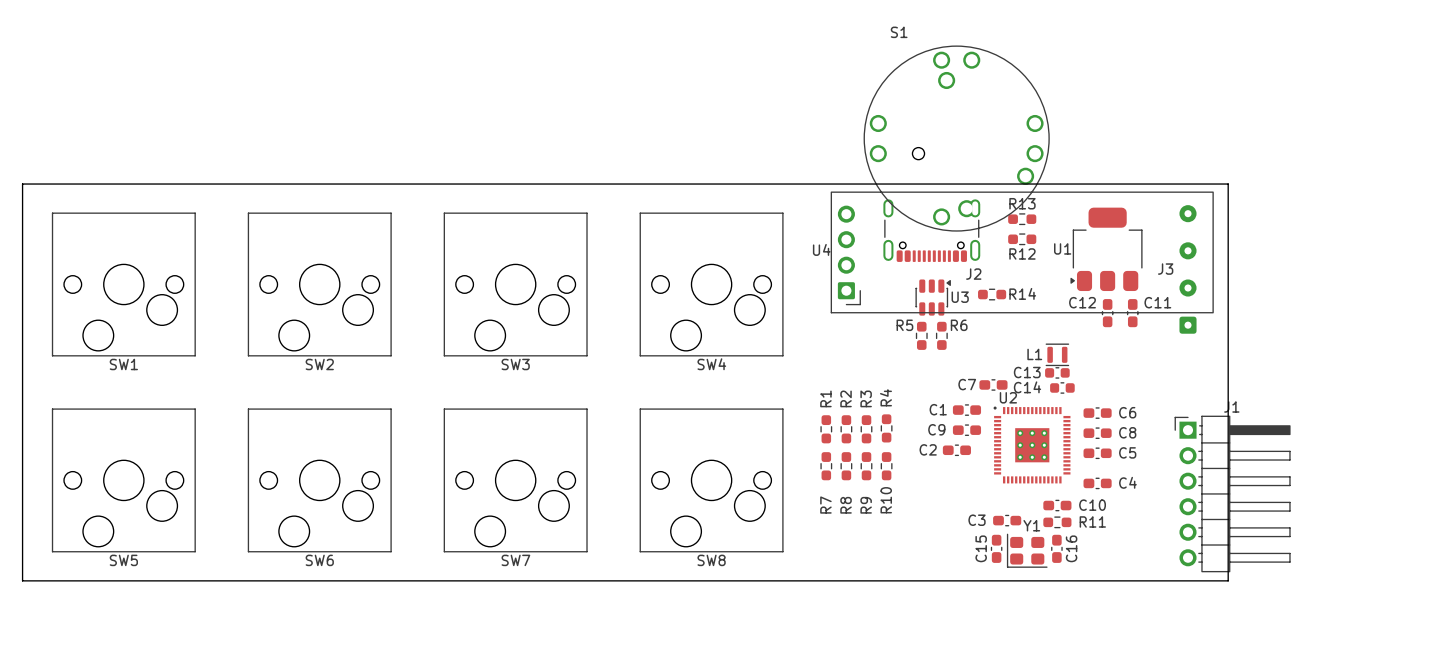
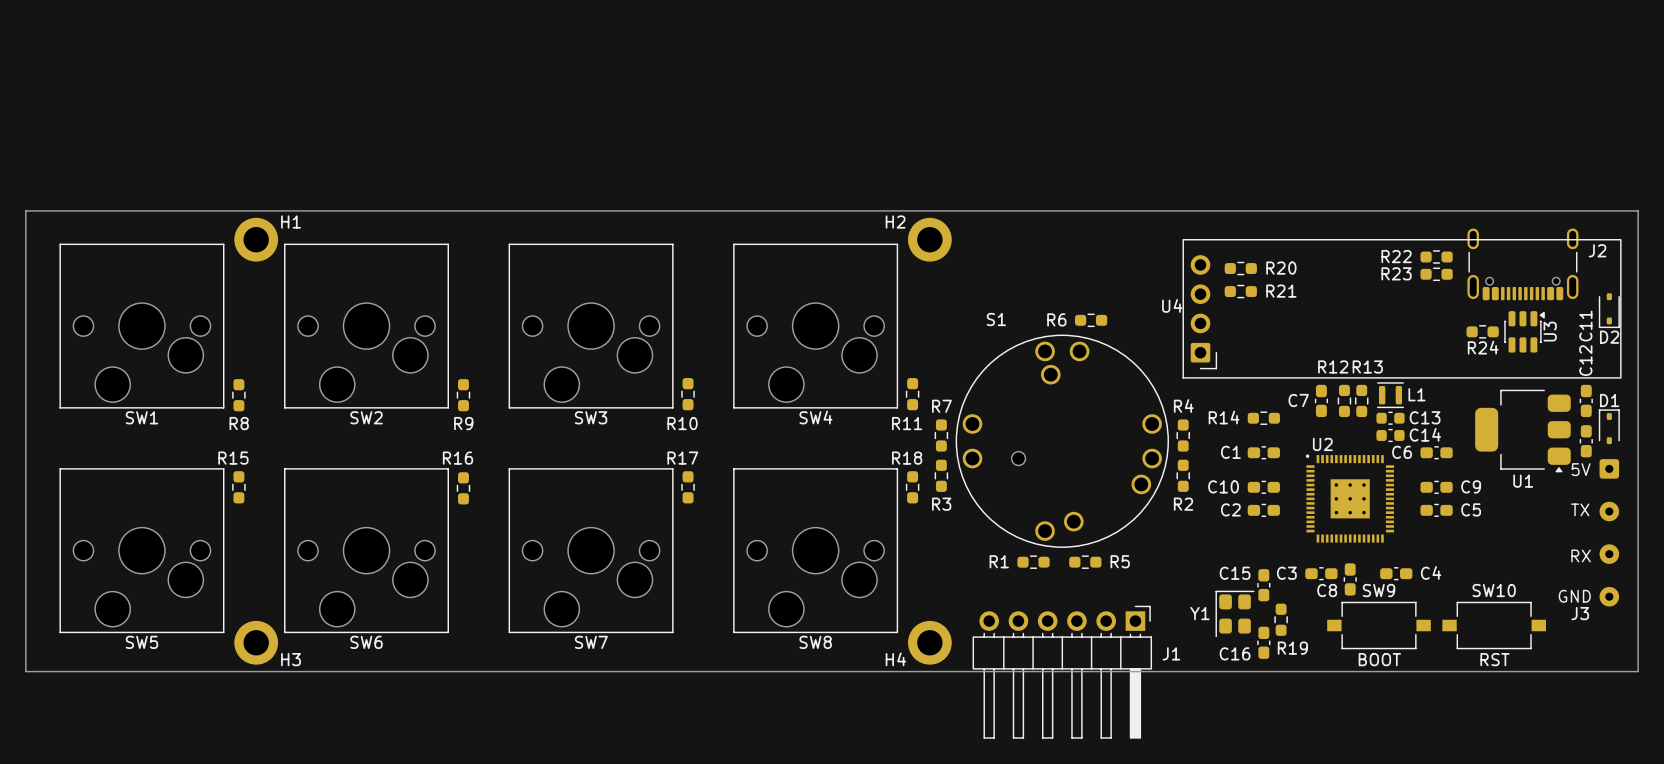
S1 position: (956, 138) -> (1062, 441)
board edge: (1228, 184) (1228, 580) (22, 580) -> (1407, 210) (1638, 210) (1638, 671) (25, 671) (25, 665)
H1: none -> (256, 239)
H2: none -> (929, 239)
R13 rotation: 0° (1022, 219) -> 90° clockwise (1361, 400)
R13 position: (1022, 219) -> (1361, 400)
R22: none -> (1436, 256)
J2 position: (931, 230) -> (1522, 264)
R20: none -> (1240, 268)
R12 rotation: 0° (1022, 239) -> 90° clockwise (1344, 400)
R12 position: (1022, 239) -> (1344, 400)
R23: none -> (1436, 274)
U1 rotation: 0° (1106, 249) -> 90° counterclockwise (1522, 431)
U1 position: (1106, 249) -> (1522, 431)
U4 position: (1022, 252) -> (1402, 308)
R12 name position: R12 (1022, 253) -> R12 (1333, 366)
R21: none -> (1240, 291)
J3 name position: J3 (1165, 269) -> J3 (1580, 613)
J3 rotation: 0° (1188, 269) -> 180° (1609, 532)
J3 position: (1188, 269) -> (1609, 532)
D2: none -> (1609, 310)
J2 name position: J2 (973, 274) -> J2 (1597, 250)
R24: none -> (1482, 331)
R14 name position: R14 (1022, 293) -> R14 (1224, 417)
R14 position: (992, 294) -> (1263, 418)
U3 position: (933, 297) -> (1524, 331)
U3 name rotation: 0° (960, 297) -> 90° counterclockwise (1550, 331)
C12 name rotation: 0° (1082, 302) -> 90° counterclockwise (1585, 360)
C12 name position: C12 (1082, 302) -> C12 (1585, 360)
C11 name rotation: 0° (1157, 302) -> 90° counterclockwise (1585, 326)
C11 name position: C11 (1157, 302) -> C11 (1585, 326)
C12 position: (1107, 313) -> (1586, 441)
C11 position: (1132, 313) -> (1586, 400)
R5 name position: R5 (904, 325) -> R5 (1120, 561)
R6 name position: R6 (959, 325) -> R6 (1056, 319)
R5 rotation: 0° (921, 335) -> 90° clockwise (1085, 562)
R5 position: (921, 335) -> (1085, 562)
R6 rotation: 0° (941, 335) -> 90° clockwise (1091, 320)
R6 position: (941, 335) -> (1091, 320)
L1 name position: L1 (1034, 354) -> L1 (1416, 394)
L1 position: (1057, 354) -> (1390, 395)
C13 name position: C13 (1027, 372) -> C13 (1425, 417)
C13 position: (1057, 372) -> (1390, 418)
D1: none -> (1609, 426)
C7 rotation: 0° (993, 384) -> 90° clockwise (1321, 400)
C7 position: (993, 384) -> (1321, 400)
C14 name position: C14 (1027, 387) -> C14 (1425, 434)
C14 position: (1062, 387) -> (1390, 435)
R4 name rotation: 0° (885, 397) -> 90° clockwise (1183, 406)
R1 name position: R1 (825, 398) -> R1 (999, 561)
R2 name rotation: 0° (846, 398) -> 90° clockwise (1183, 504)
R2 name position: R2 (846, 398) -> R2 (1183, 504)
R3 name rotation: 0° (866, 398) -> 90° clockwise (941, 504)
R3 name position: R3 (866, 398) -> R3 (941, 504)
text: none -> 5V (1581, 469)
C1 position: (966, 410) -> (1263, 452)
C6 name position: C6 (1127, 412) -> C6 (1402, 452)
C6 position: (1097, 413) -> (1436, 452)
R15: none -> (238, 487)
R17: none -> (688, 487)
R18: none -> (912, 487)
R16: none -> (463, 488)
R4 position: (886, 428) -> (1183, 435)
R1 rotation: 0° (826, 429) -> 90° clockwise (1033, 562)
R1 position: (826, 429) -> (1033, 562)
R2 position: (846, 429) -> (1183, 475)
R3 position: (866, 429) -> (941, 475)
C9 name position: C9 (936, 429) -> C9 (1471, 486)
C9 position: (966, 430) -> (1436, 487)
C8 name position: C8 (1127, 432) -> C8 (1327, 590)
C8 rotation: 0° (1097, 433) -> 90° clockwise (1350, 579)
C8 position: (1097, 433) -> (1350, 579)
U2 position: (1032, 444) -> (1349, 498)
text: none -> TX (1580, 509)
C2 position: (956, 450) -> (1263, 510)
C5 position: (1097, 453) -> (1436, 510)
R7 position: (826, 466) -> (941, 435)
R8 position: (846, 466) -> (238, 395)
R9 position: (866, 466) -> (463, 395)
R10 position: (886, 466) -> (688, 394)
C4 position: (1097, 483) -> (1396, 573)
text: none -> RX (1581, 555)
J1 rotation: 0° (1232, 493) -> 90° clockwise (1062, 672)
J1 position: (1232, 493) -> (1062, 672)
R10 name rotation: 0° (886, 500) -> 90° clockwise (682, 423)
R7 name rotation: 0° (825, 505) -> 90° clockwise (941, 406)
R7 name position: R7 (825, 505) -> R7 (941, 406)
R8 name rotation: 0° (846, 505) -> 90° clockwise (239, 423)
R9 name rotation: 0° (866, 505) -> 90° clockwise (463, 423)
C10 position: (1057, 505) -> (1263, 487)
C10 name position: C10 (1092, 505) -> C10 (1223, 486)
C3 position: (1007, 520) -> (1321, 573)
text: none -> GND (1574, 596)
R11 rotation: 0° (1057, 522) -> 90° clockwise (912, 394)
R11 position: (1057, 522) -> (912, 394)
Y1 name position: Y1 (1031, 525) -> Y1 (1199, 613)
R19: none -> (1281, 619)
SW9: none -> BOOT (1379, 625)
SW10: none -> RST (1494, 625)
C15 name rotation: 0° (981, 548) -> 90° clockwise (1235, 573)
C15 position: (996, 548) -> (1263, 585)
C16 position: (1056, 548) -> (1263, 642)
C16 name rotation: 0° (1071, 548) -> 90° clockwise (1235, 653)
Y1 rotation: 0° (1027, 550) -> 90° clockwise (1235, 613)
Y1 position: (1027, 550) -> (1235, 613)
H3: none -> (256, 642)
H4: none -> (929, 642)

